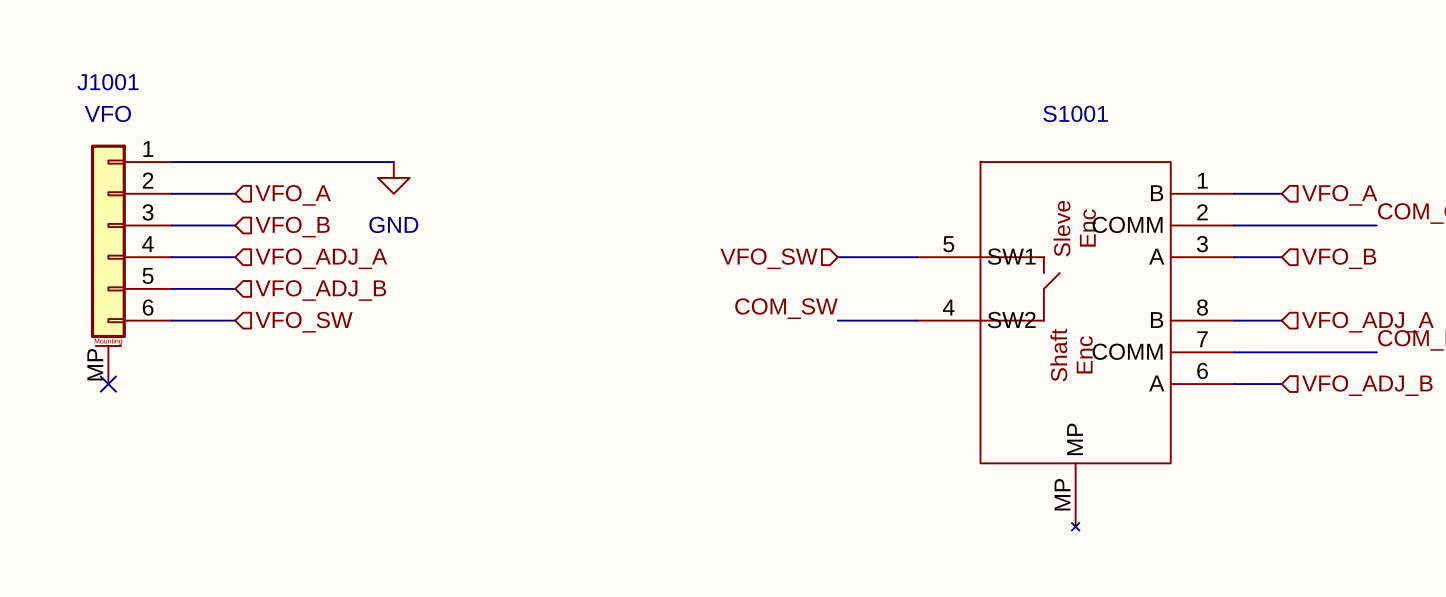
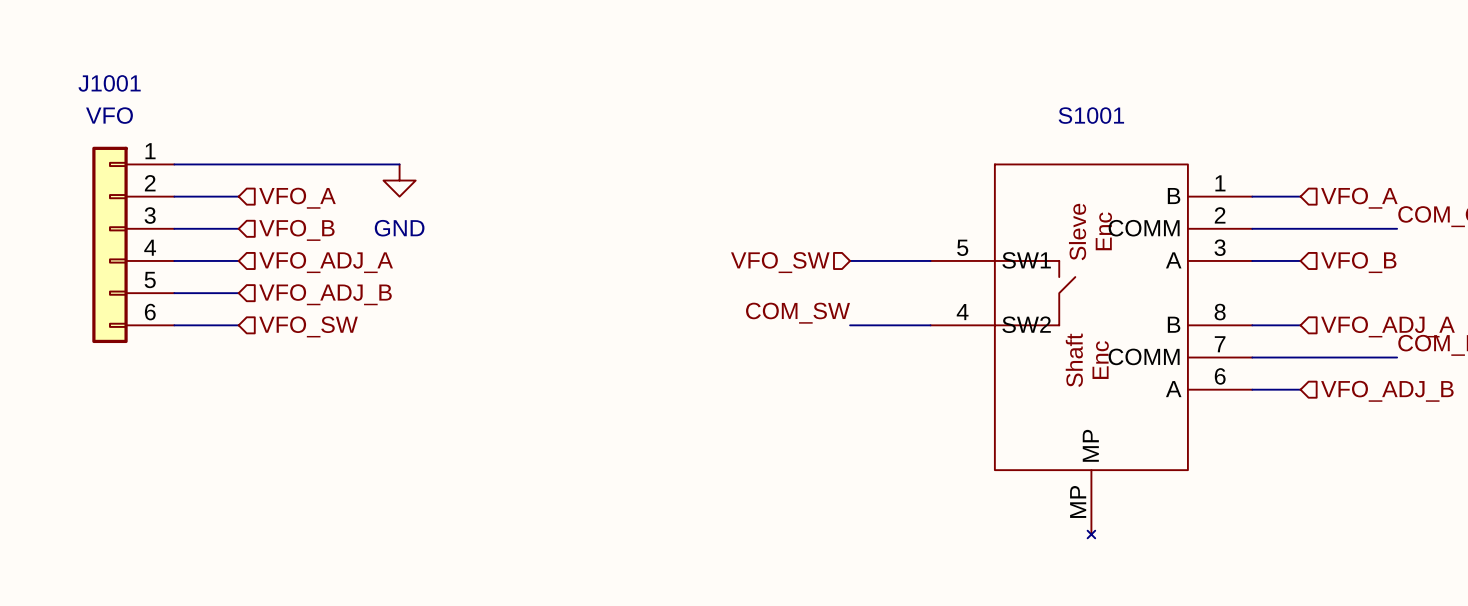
J1001 symbol: [90, 144, 172, 385] -> [92, 146, 175, 344]
no-connect mark: (108, 384) -> none

